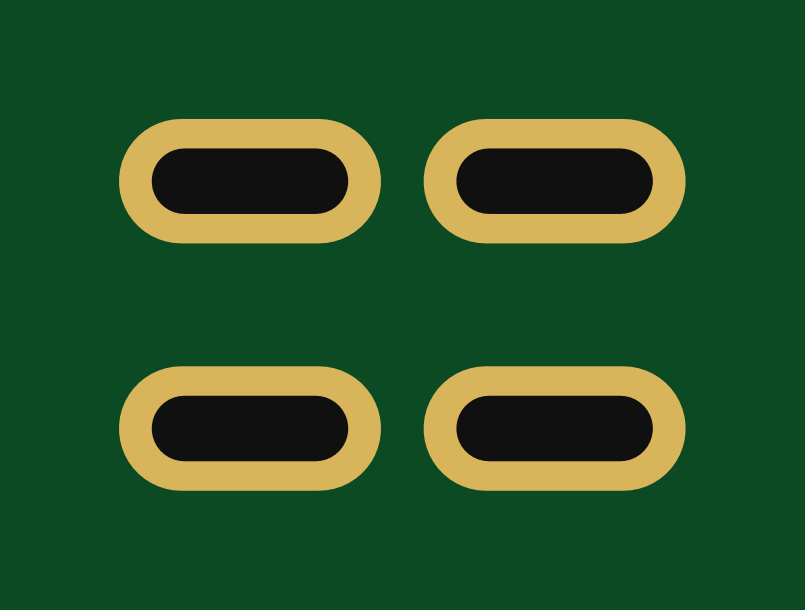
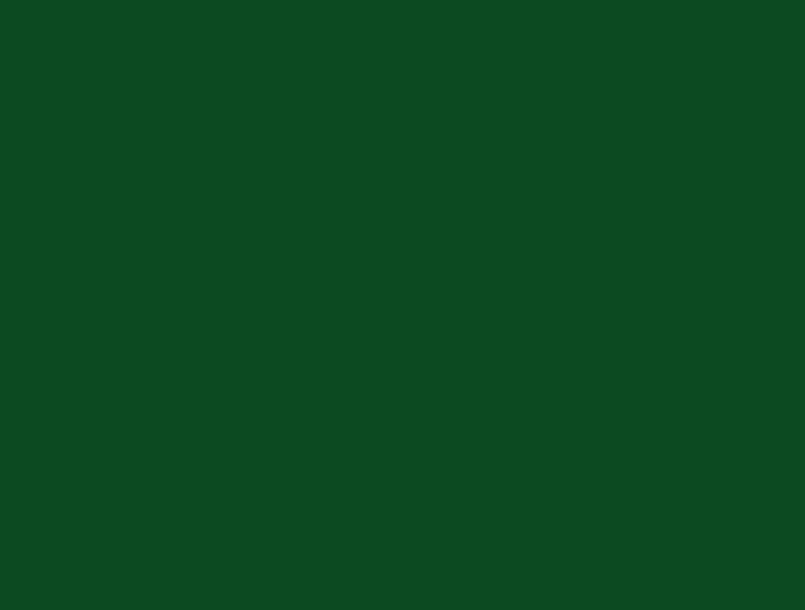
part: (402, 181) -> none
part: (402, 428) -> none

